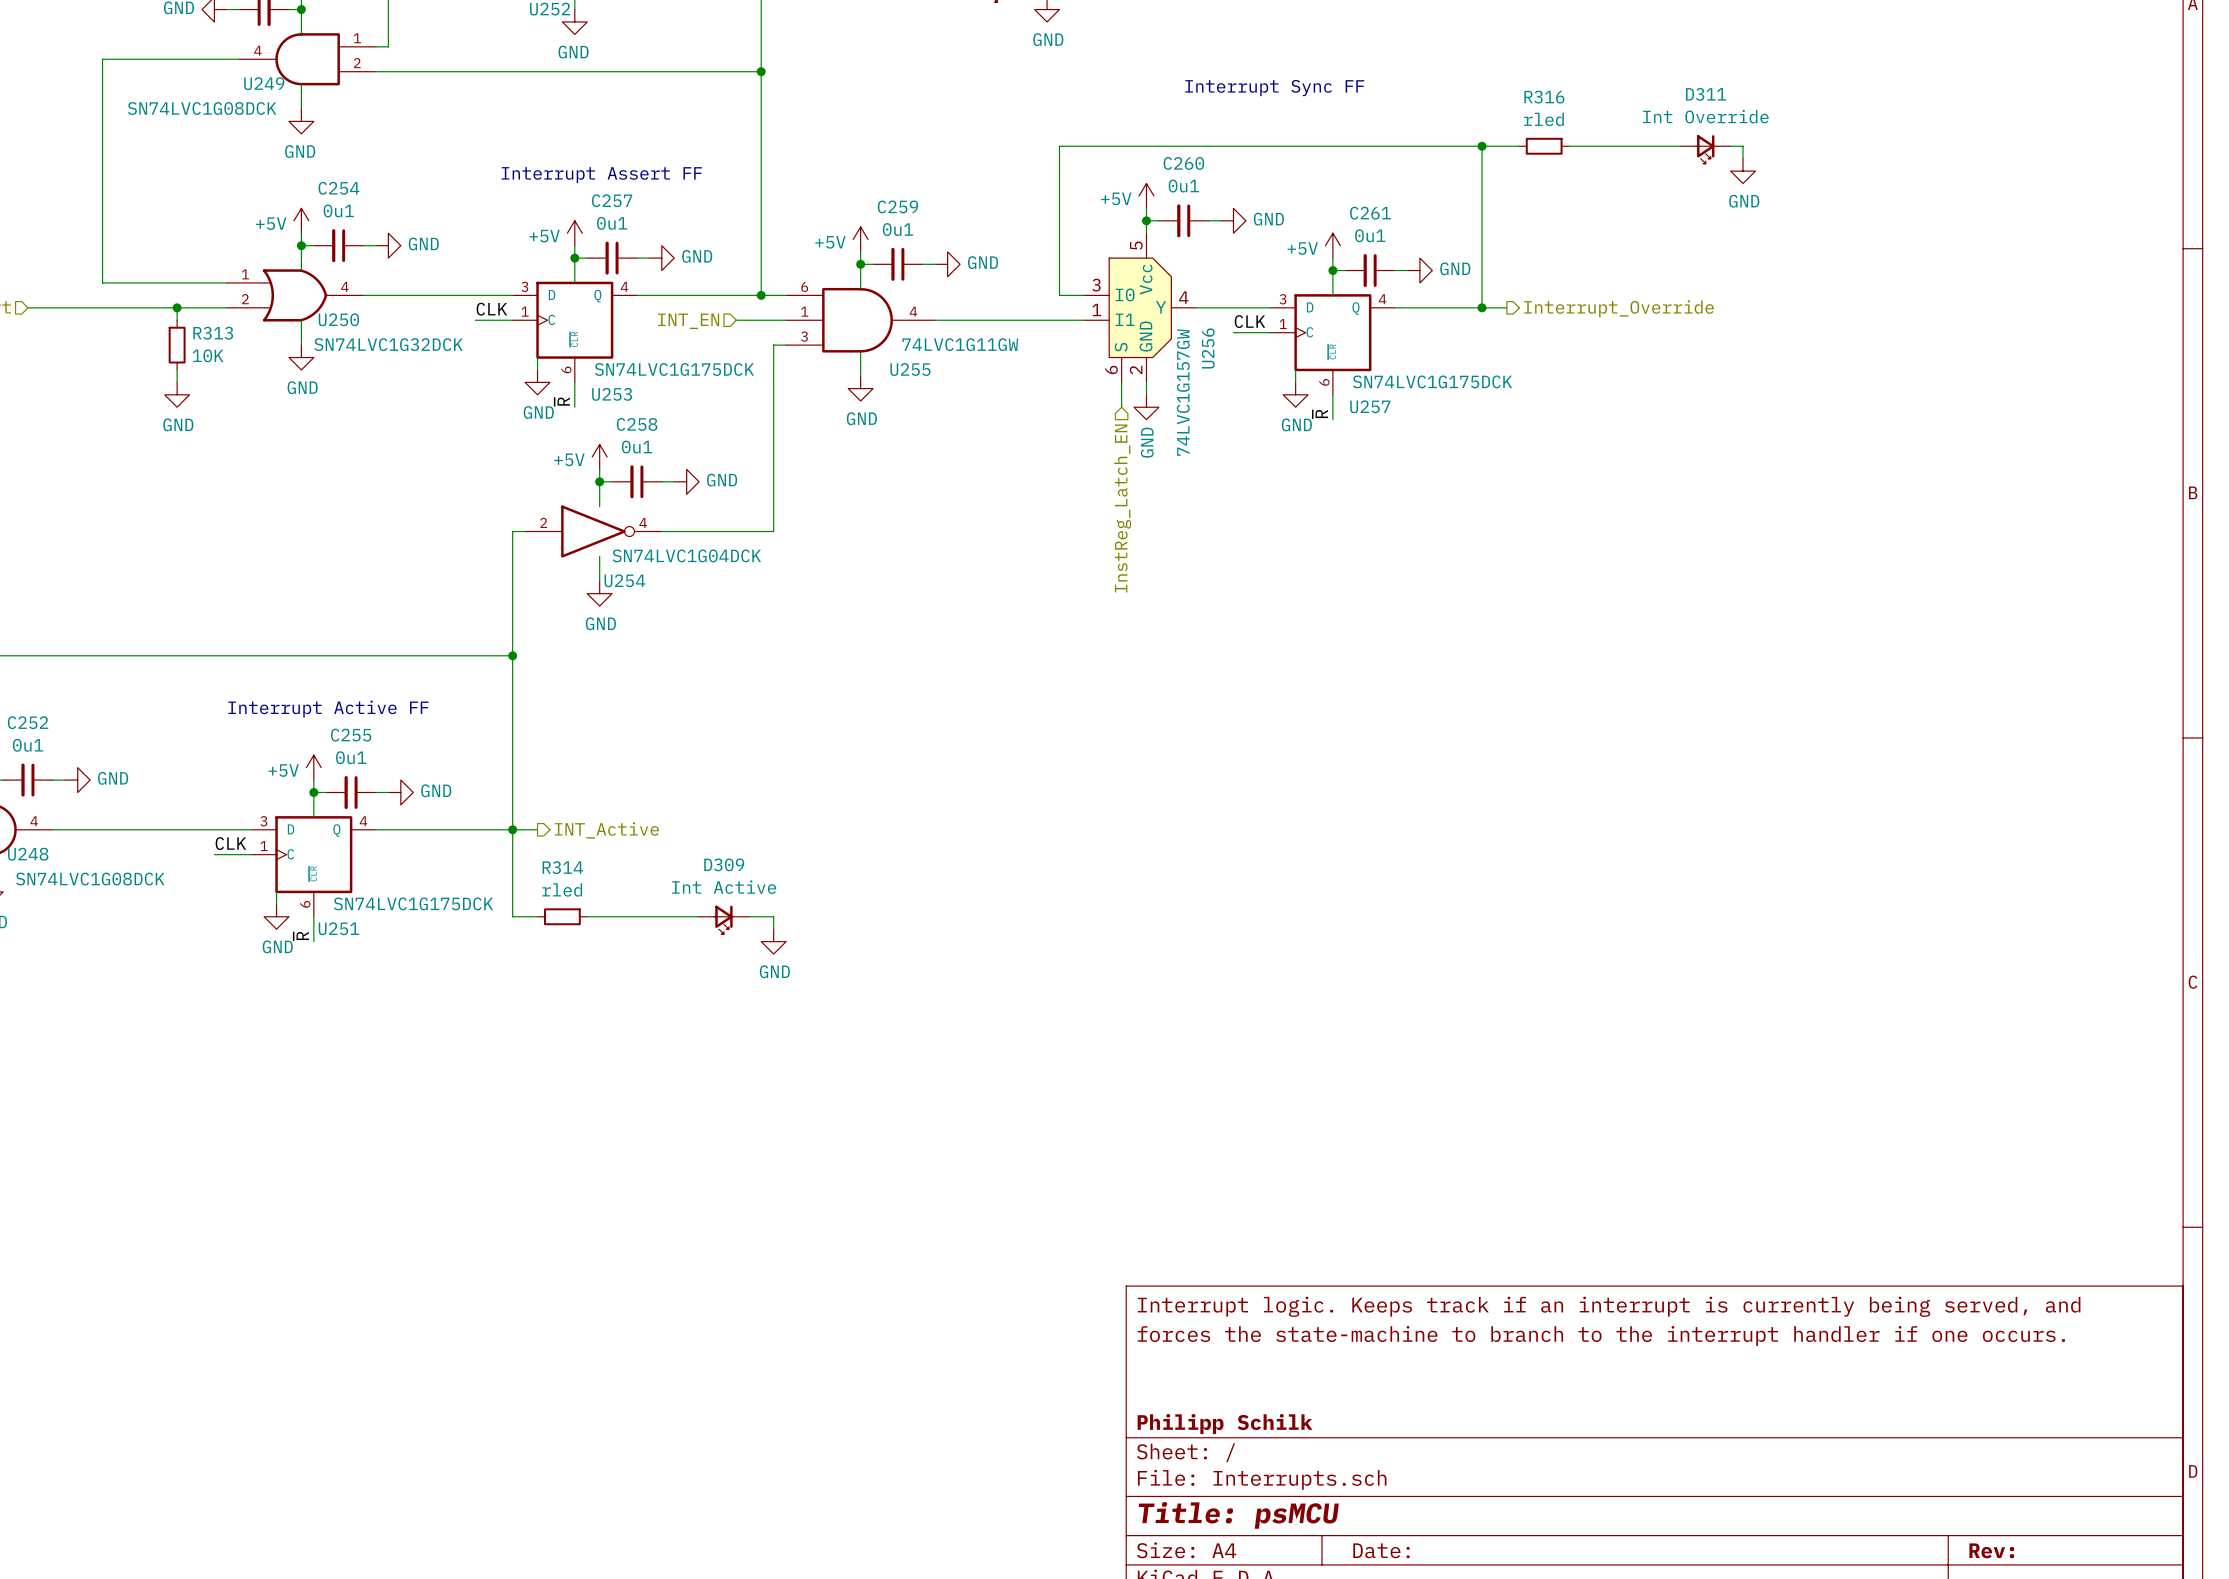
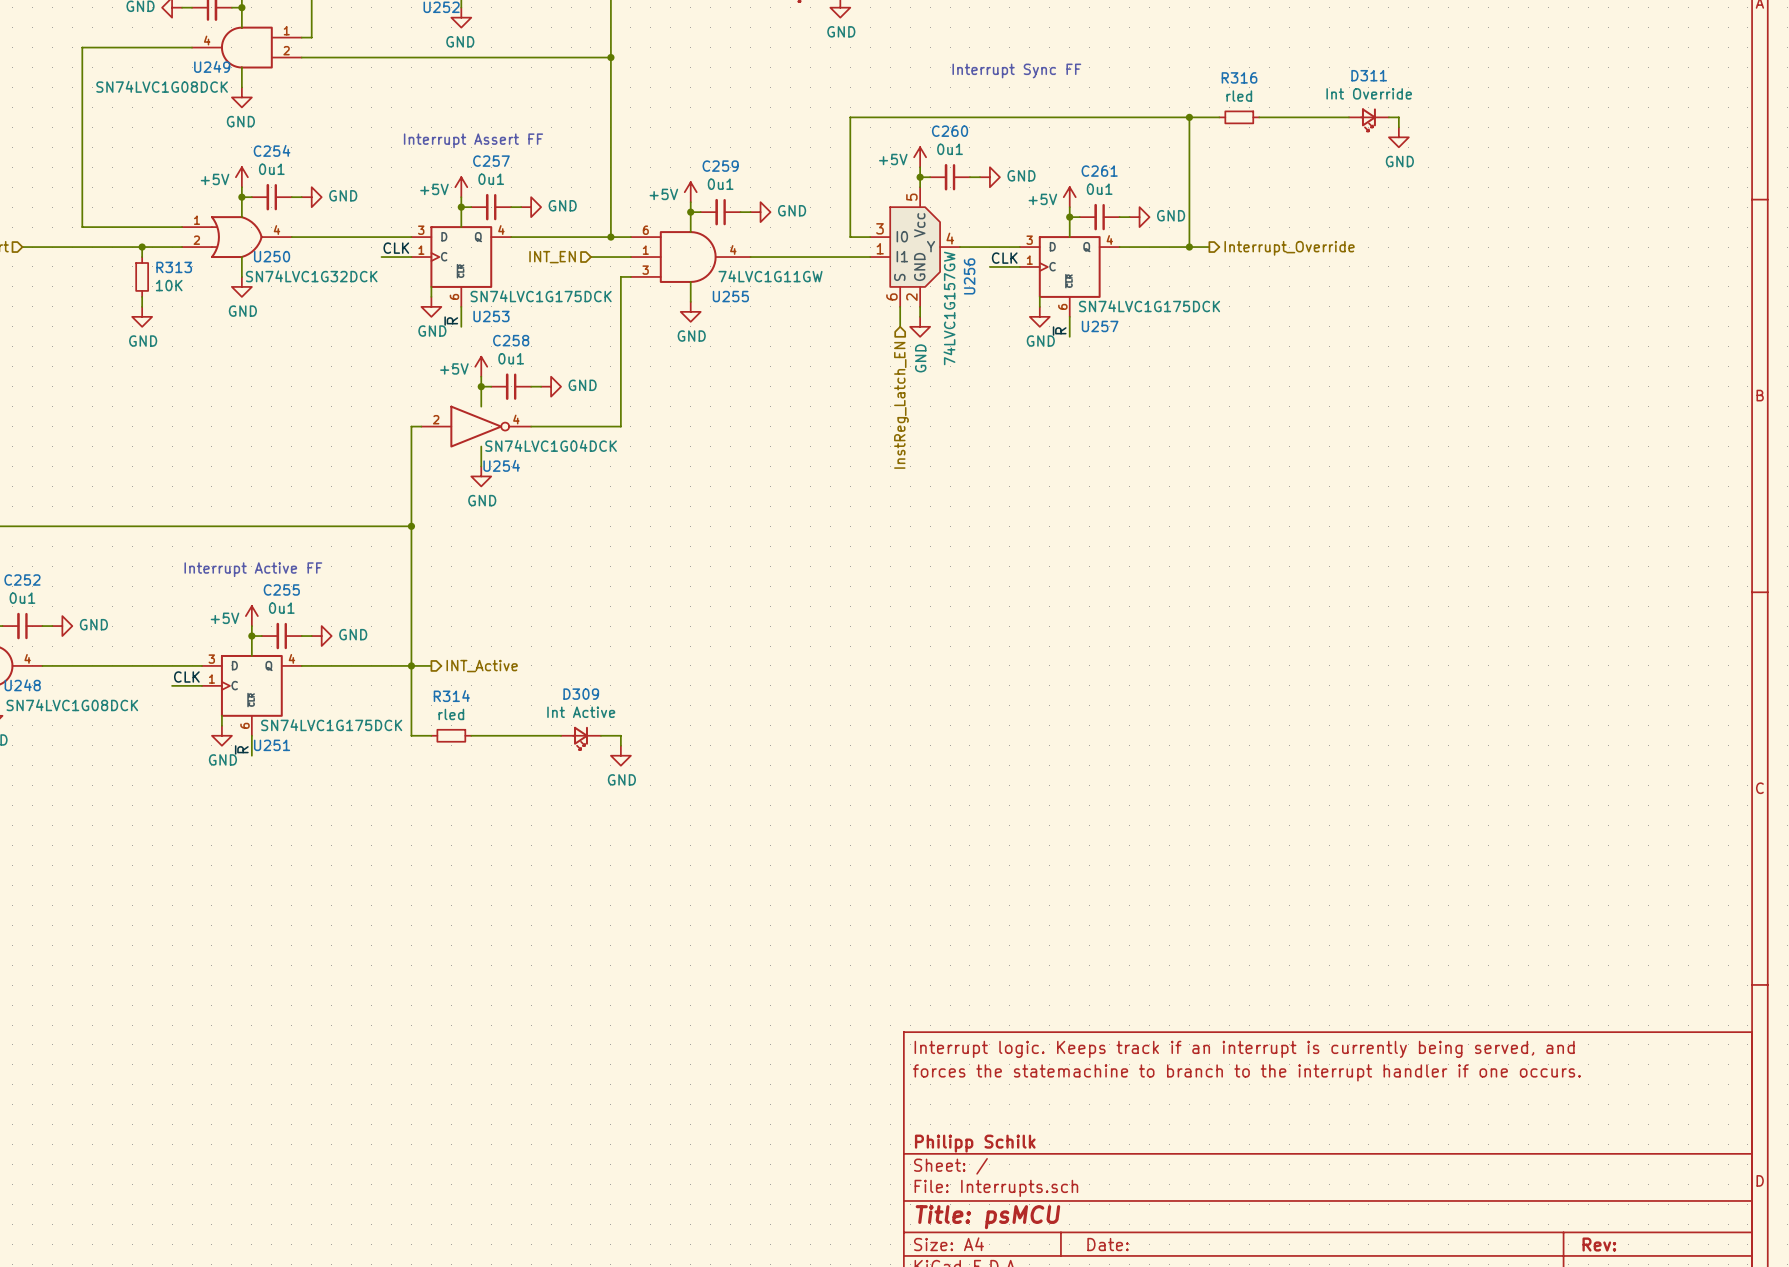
title block: forces the state-machine to branch to the interrupt handler if one occurs. (1601, 1336) -> forces the statemachine to branch to the interrupt handler if one occurs. (1246, 1072)

